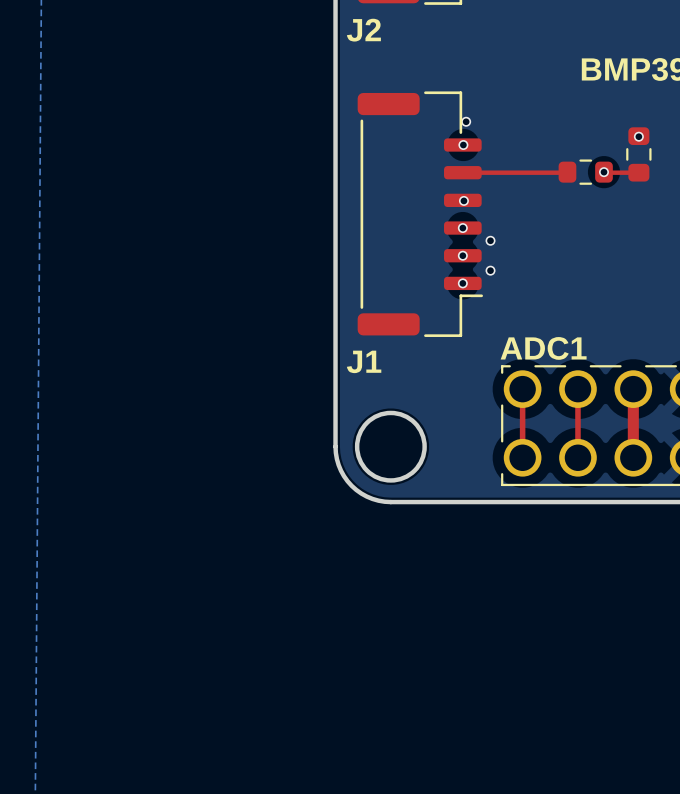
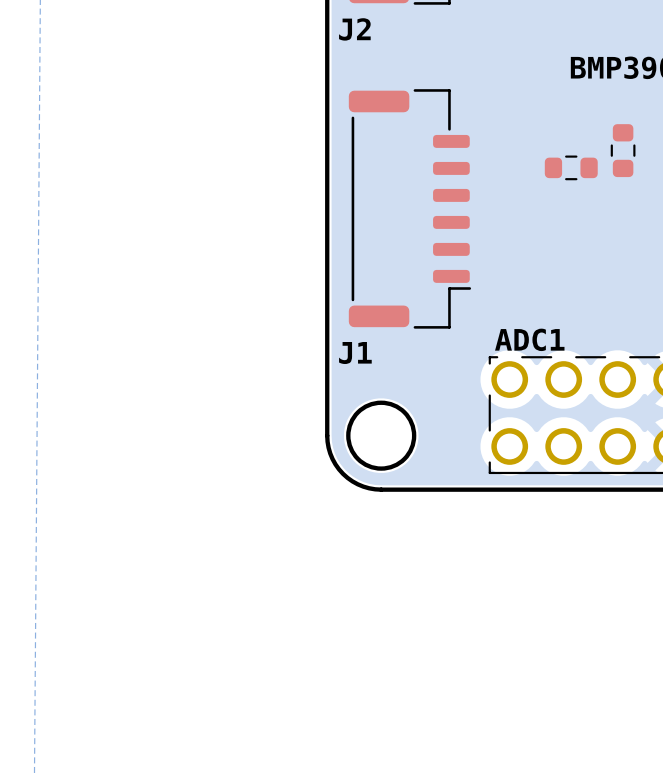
via: (466, 121) -> none
via: (638, 136) -> none
via: (463, 145) -> none
top track: (567, 172) (462, 172) -> none
top track: (604, 172) (638, 172) -> none
via: (604, 172) -> none
via: (463, 200) -> none
via: (462, 228) -> none
via: (490, 240) -> none
via: (462, 255) -> none
via: (490, 270) -> none
via: (462, 283) -> none
top track: (522, 389) (522, 457) -> none
top track: (577, 389) (577, 457) -> none
top track: (633, 389) (633, 457) -> none

